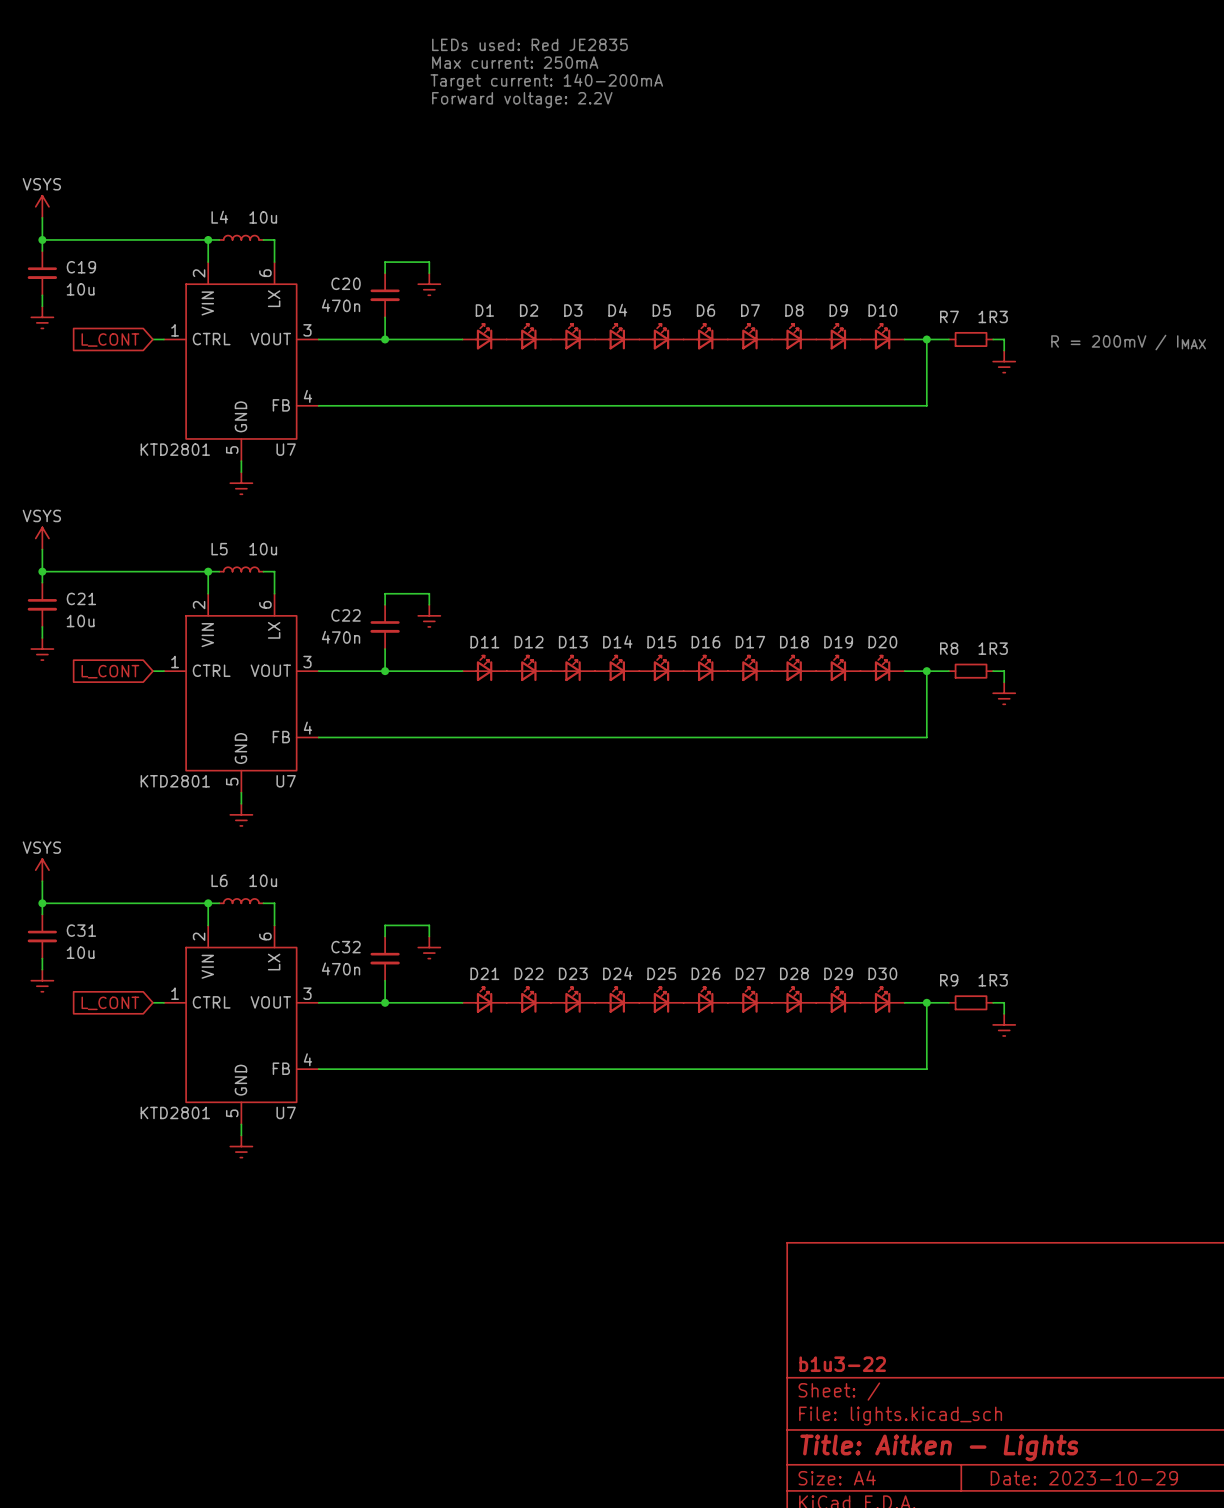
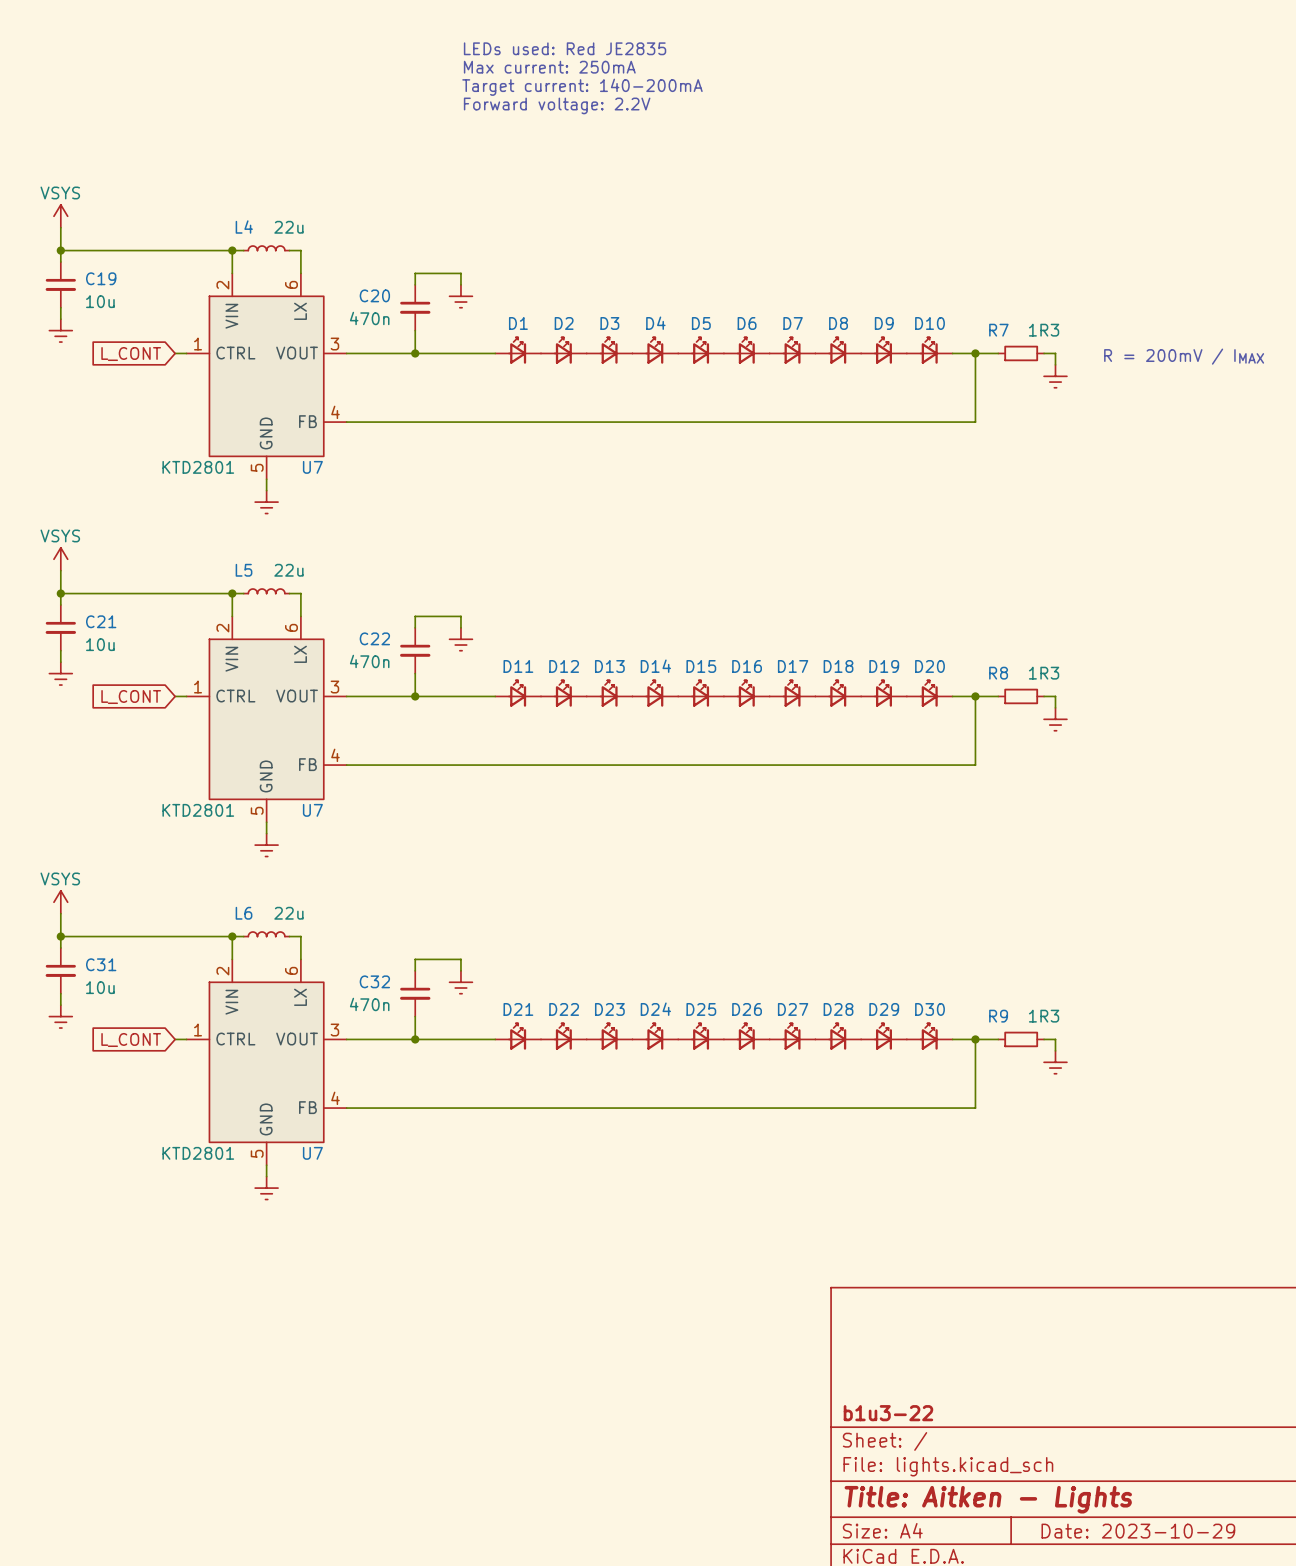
L4 value: 10u (263, 217) -> 22u (288, 227)
L5 value: 10u (263, 549) -> 22u (288, 570)
L6 value: 10u (263, 880) -> 22u (288, 913)

